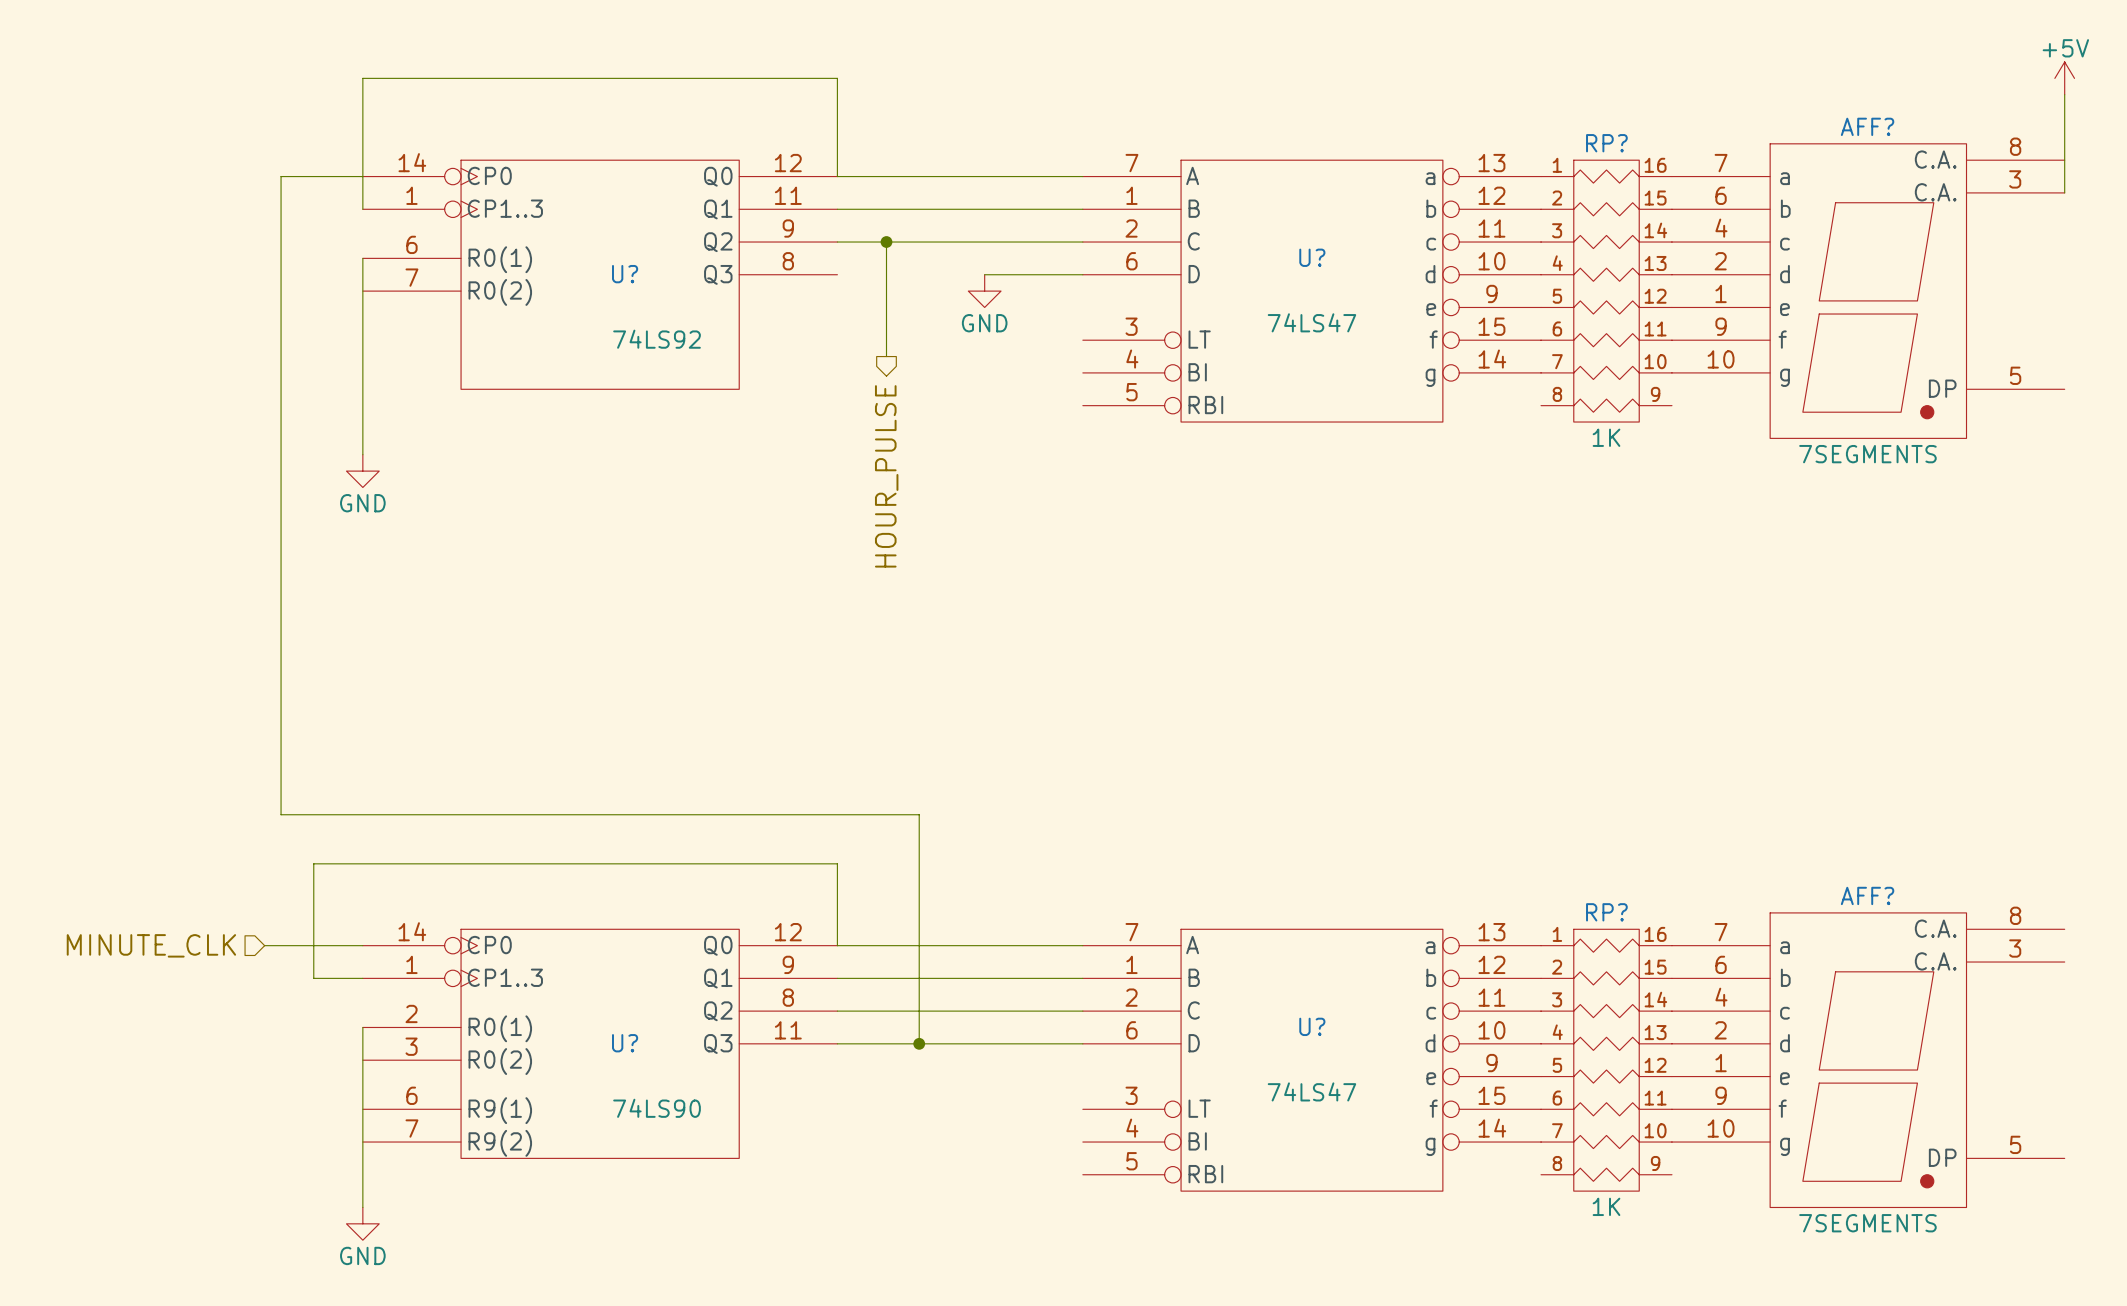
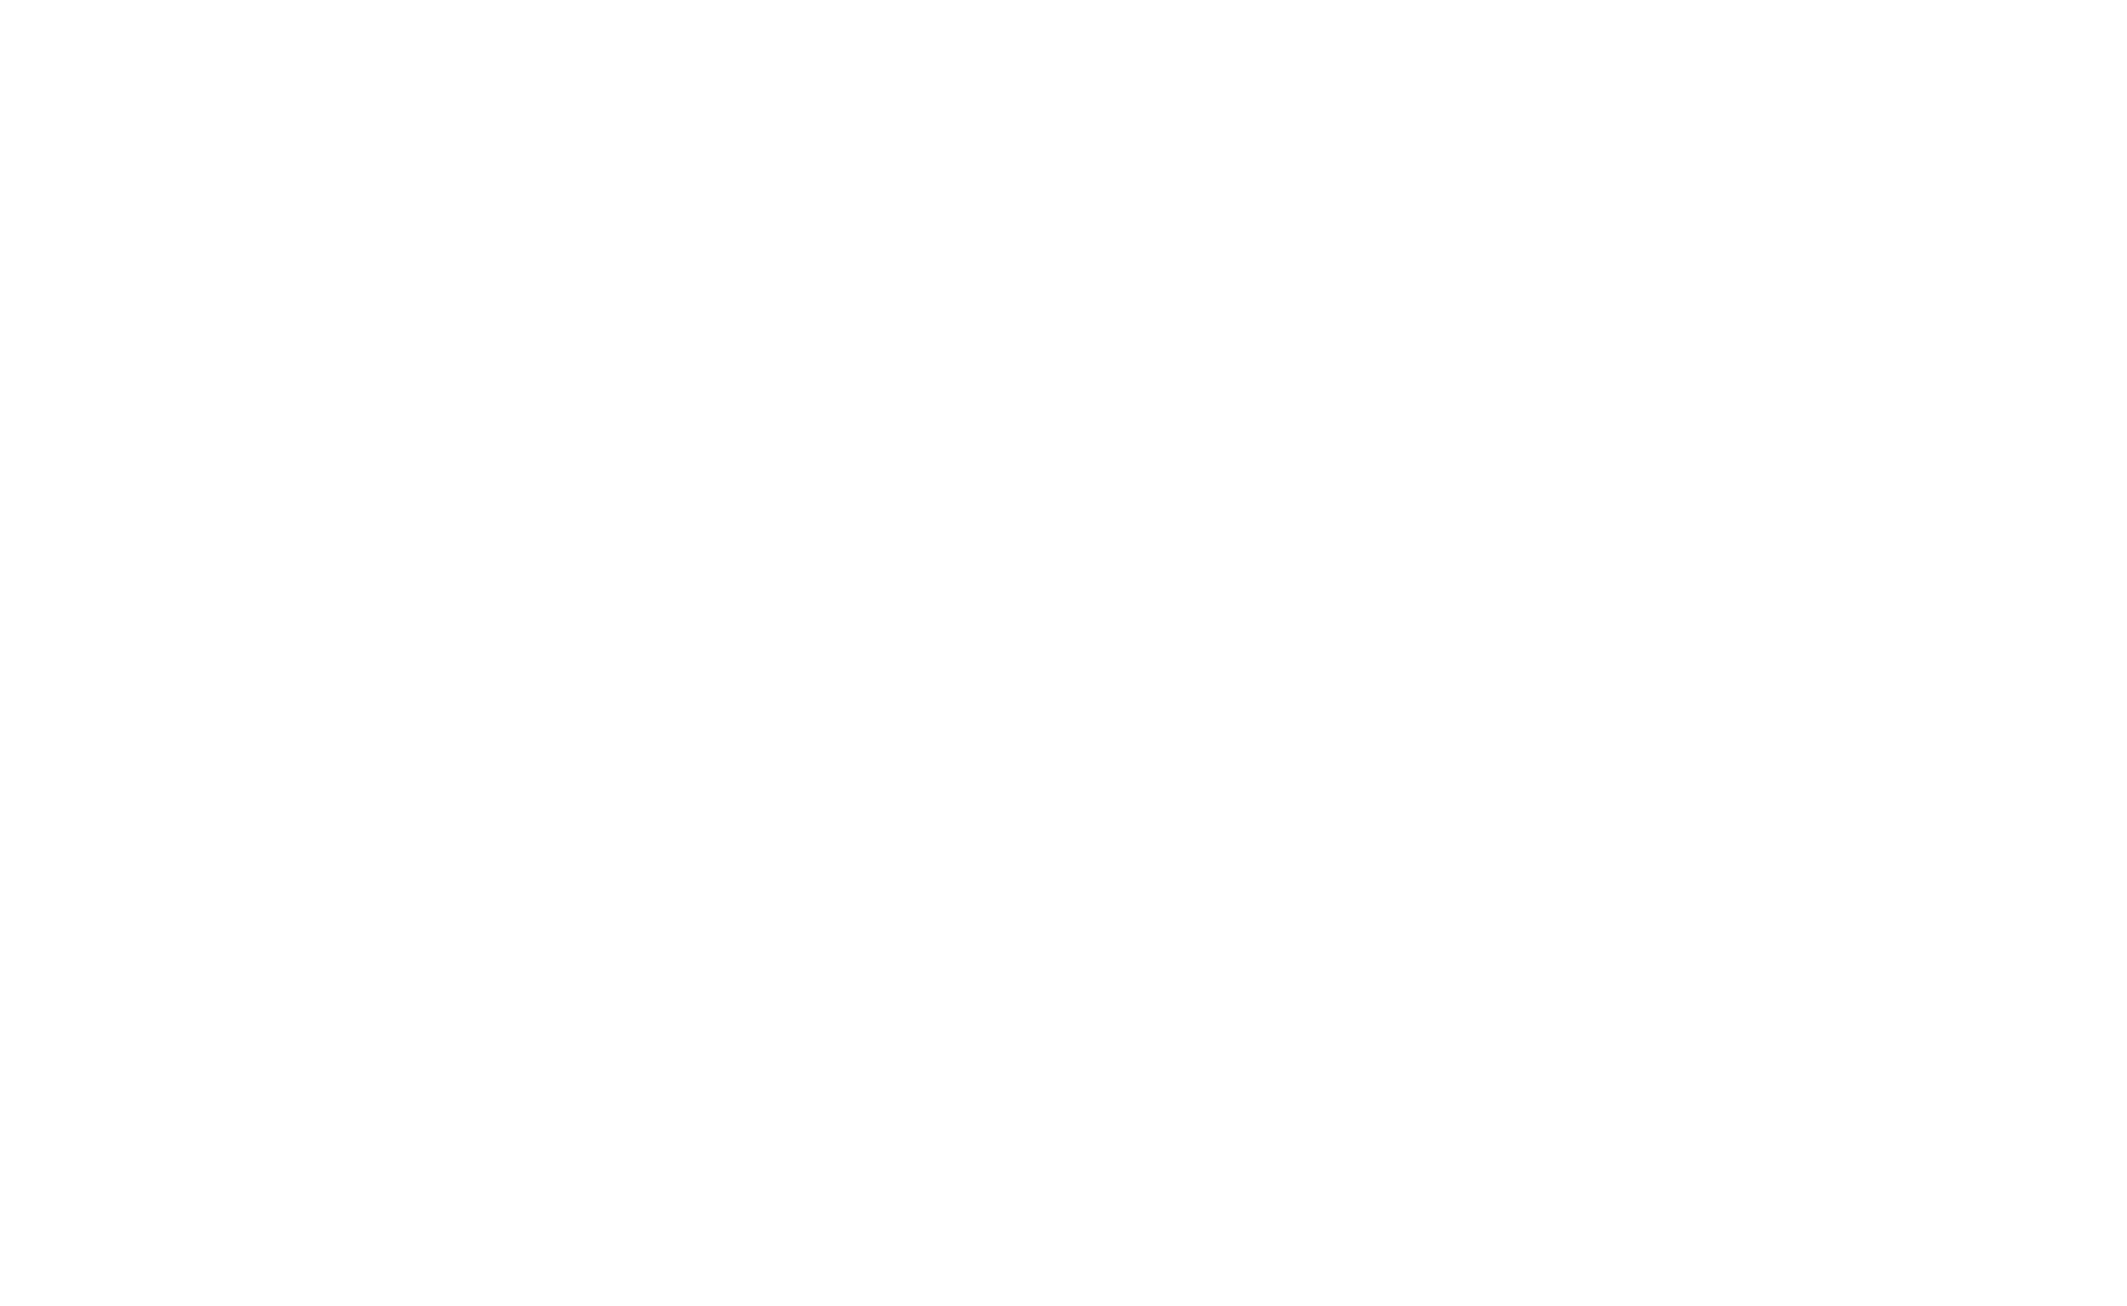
power symbol: +5V (2064, 78) -> none
wire: (2064, 94) (2064, 192) -> none
wire: (362, 176) (281, 176) (281, 814) (919, 814) (919, 1043) -> none
wire: (1082, 176) (837, 176) (837, 78) (362, 78) (362, 209) -> none
wire: (837, 209) (1082, 209) -> none
wire: (837, 242) (1082, 242) -> none
wire: (886, 242) (886, 356) -> none
junction: (886, 242) -> none
wire: (362, 258) (362, 454) -> none
U?: 74LS92 (600, 274) -> none
wire: (984, 274) (1082, 274) -> none
power symbol: GND (984, 291) -> none
U?: 74LS47 (1311, 291) -> none
RP?: 1K (1606, 291) -> none
AFF?: 7SEGMENTS (1868, 291) -> none
power symbol: GND (362, 471) -> none
hierarchical label: HOUR_PULSE (886, 476) -> none
hierarchical label: MINUTE_CLK (151, 945) -> none
wire: (264, 945) (362, 945) -> none
wire: (1082, 945) (837, 945) (837, 863) (313, 863) (313, 978) (362, 978) -> none
wire: (837, 978) (1082, 978) -> none
wire: (837, 1011) (1082, 1011) -> none
wire: (362, 1027) (362, 1207) -> none
U?: 74LS90 (600, 1043) -> none
wire: (837, 1043) (1082, 1043) -> none
junction: (919, 1043) -> none
U?: 74LS47 (1311, 1060) -> none
RP?: 1K (1606, 1060) -> none
AFF?: 7SEGMENTS (1868, 1060) -> none
power symbol: GND (362, 1223) -> none

